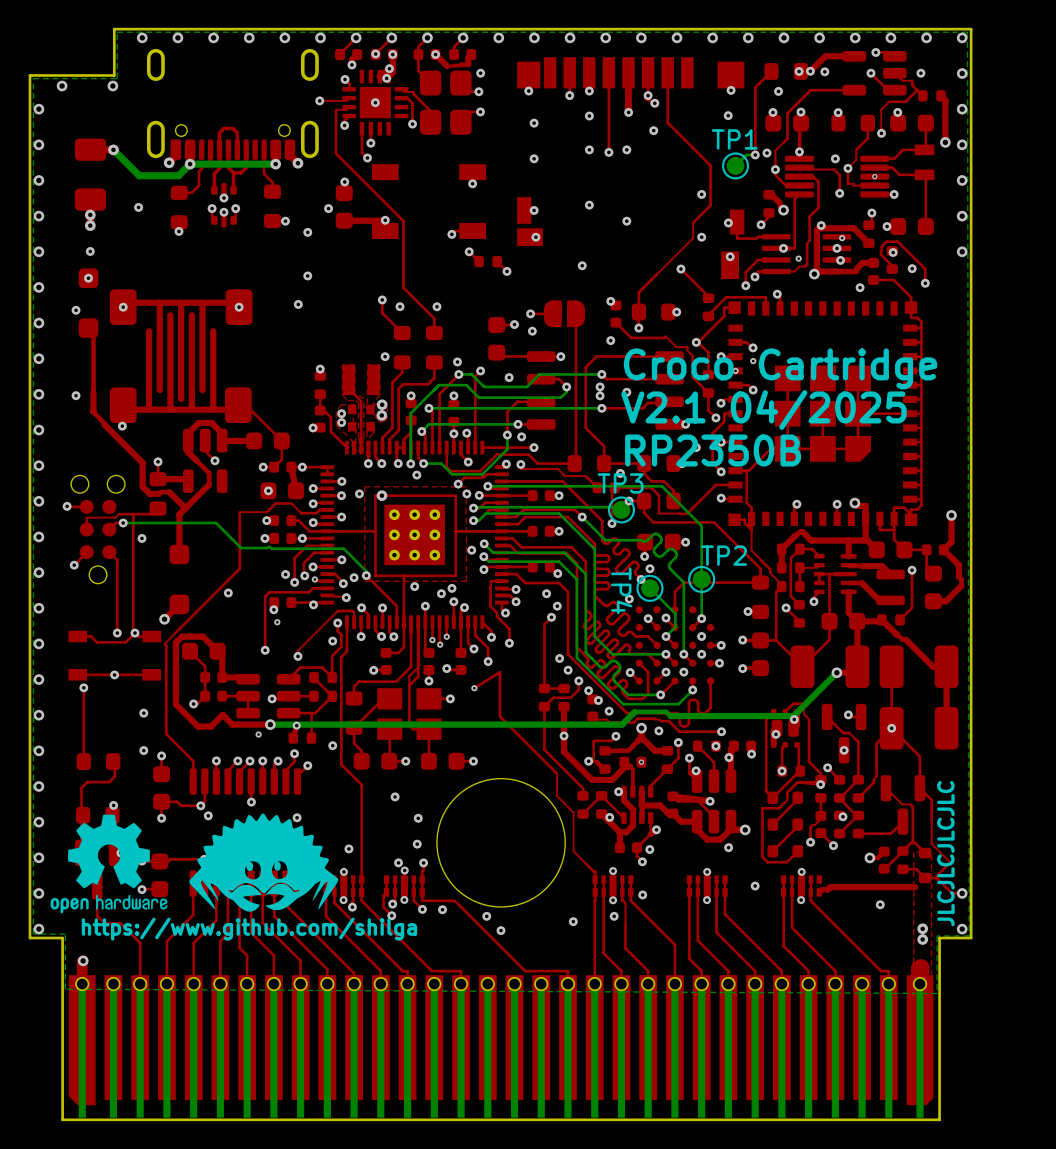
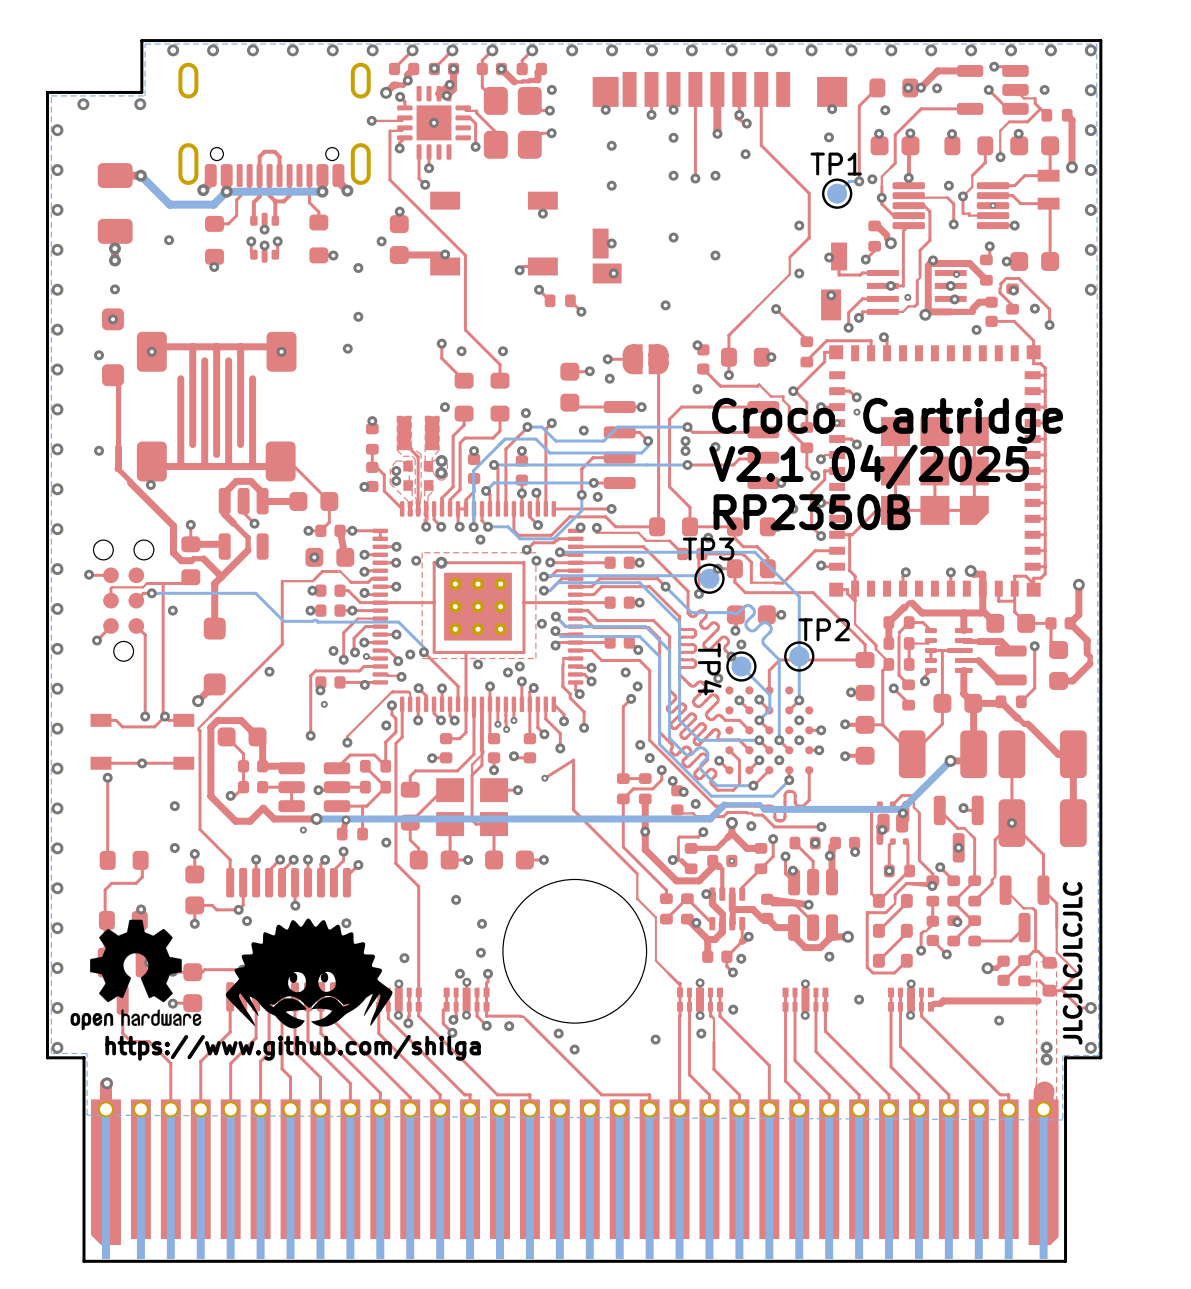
top track: none -> (407, 80) (403, 85) (393, 85) (386, 92)
via: none -> (386, 92)

